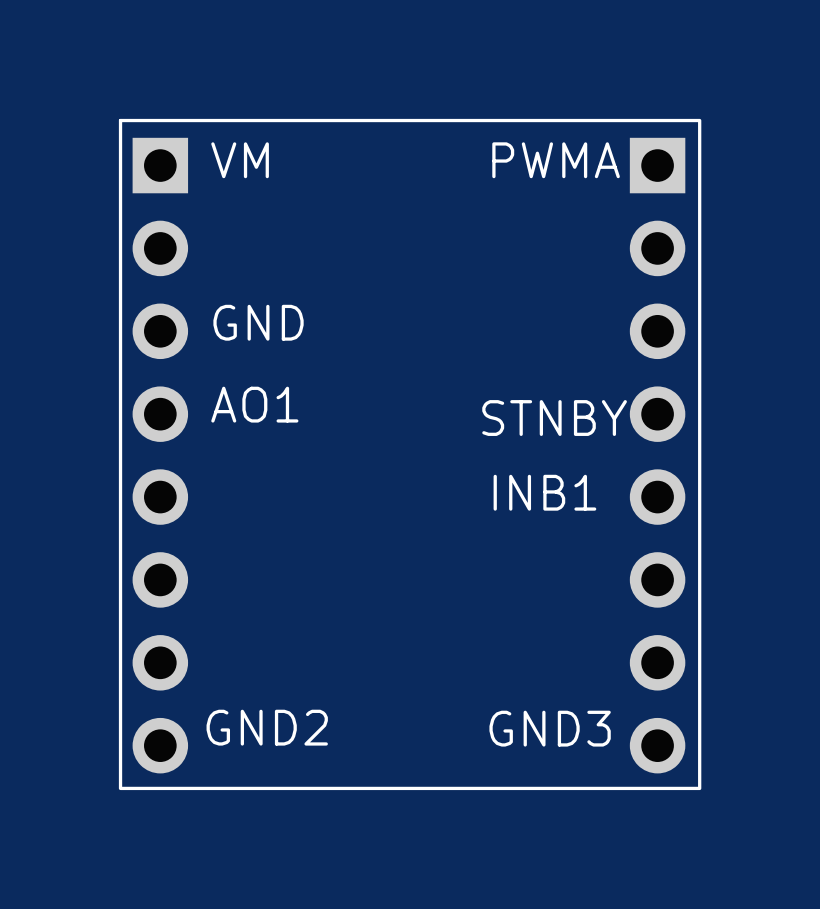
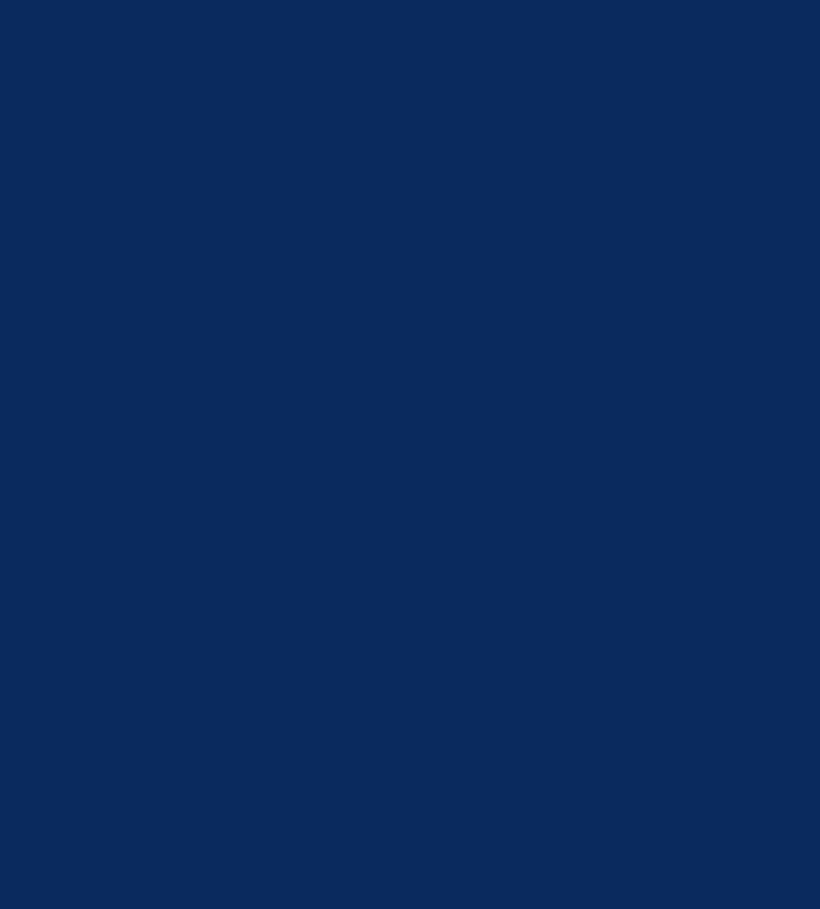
part: (410, 454) -> none

